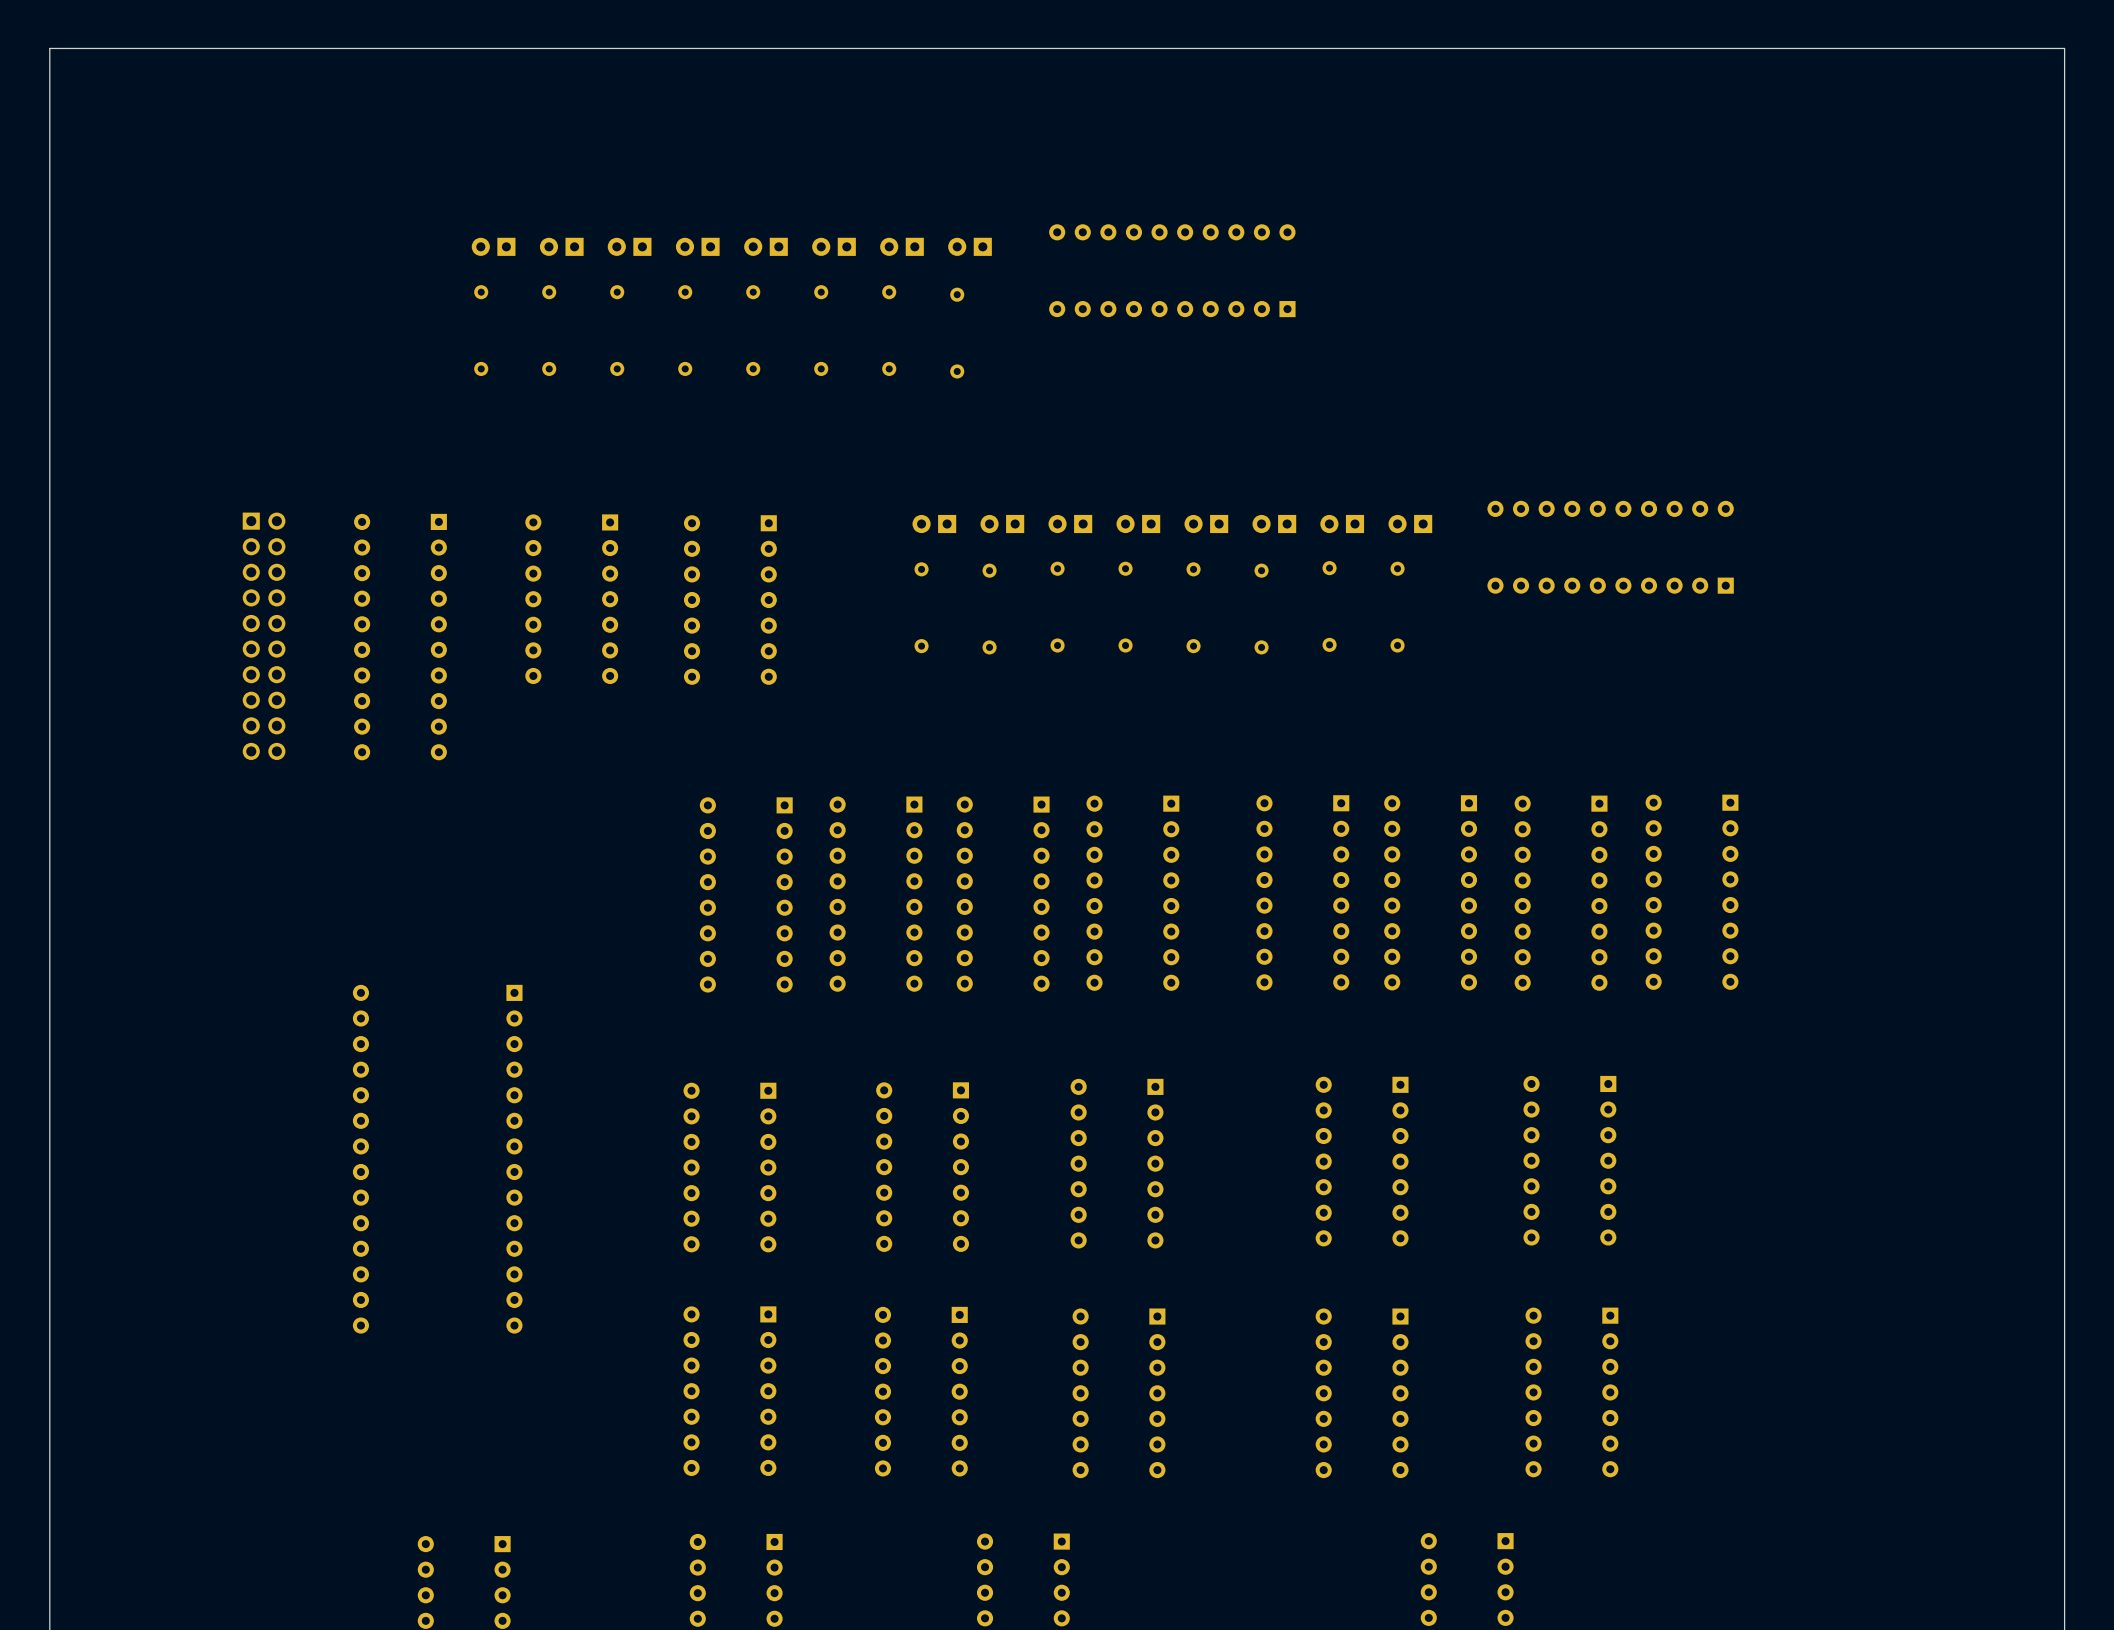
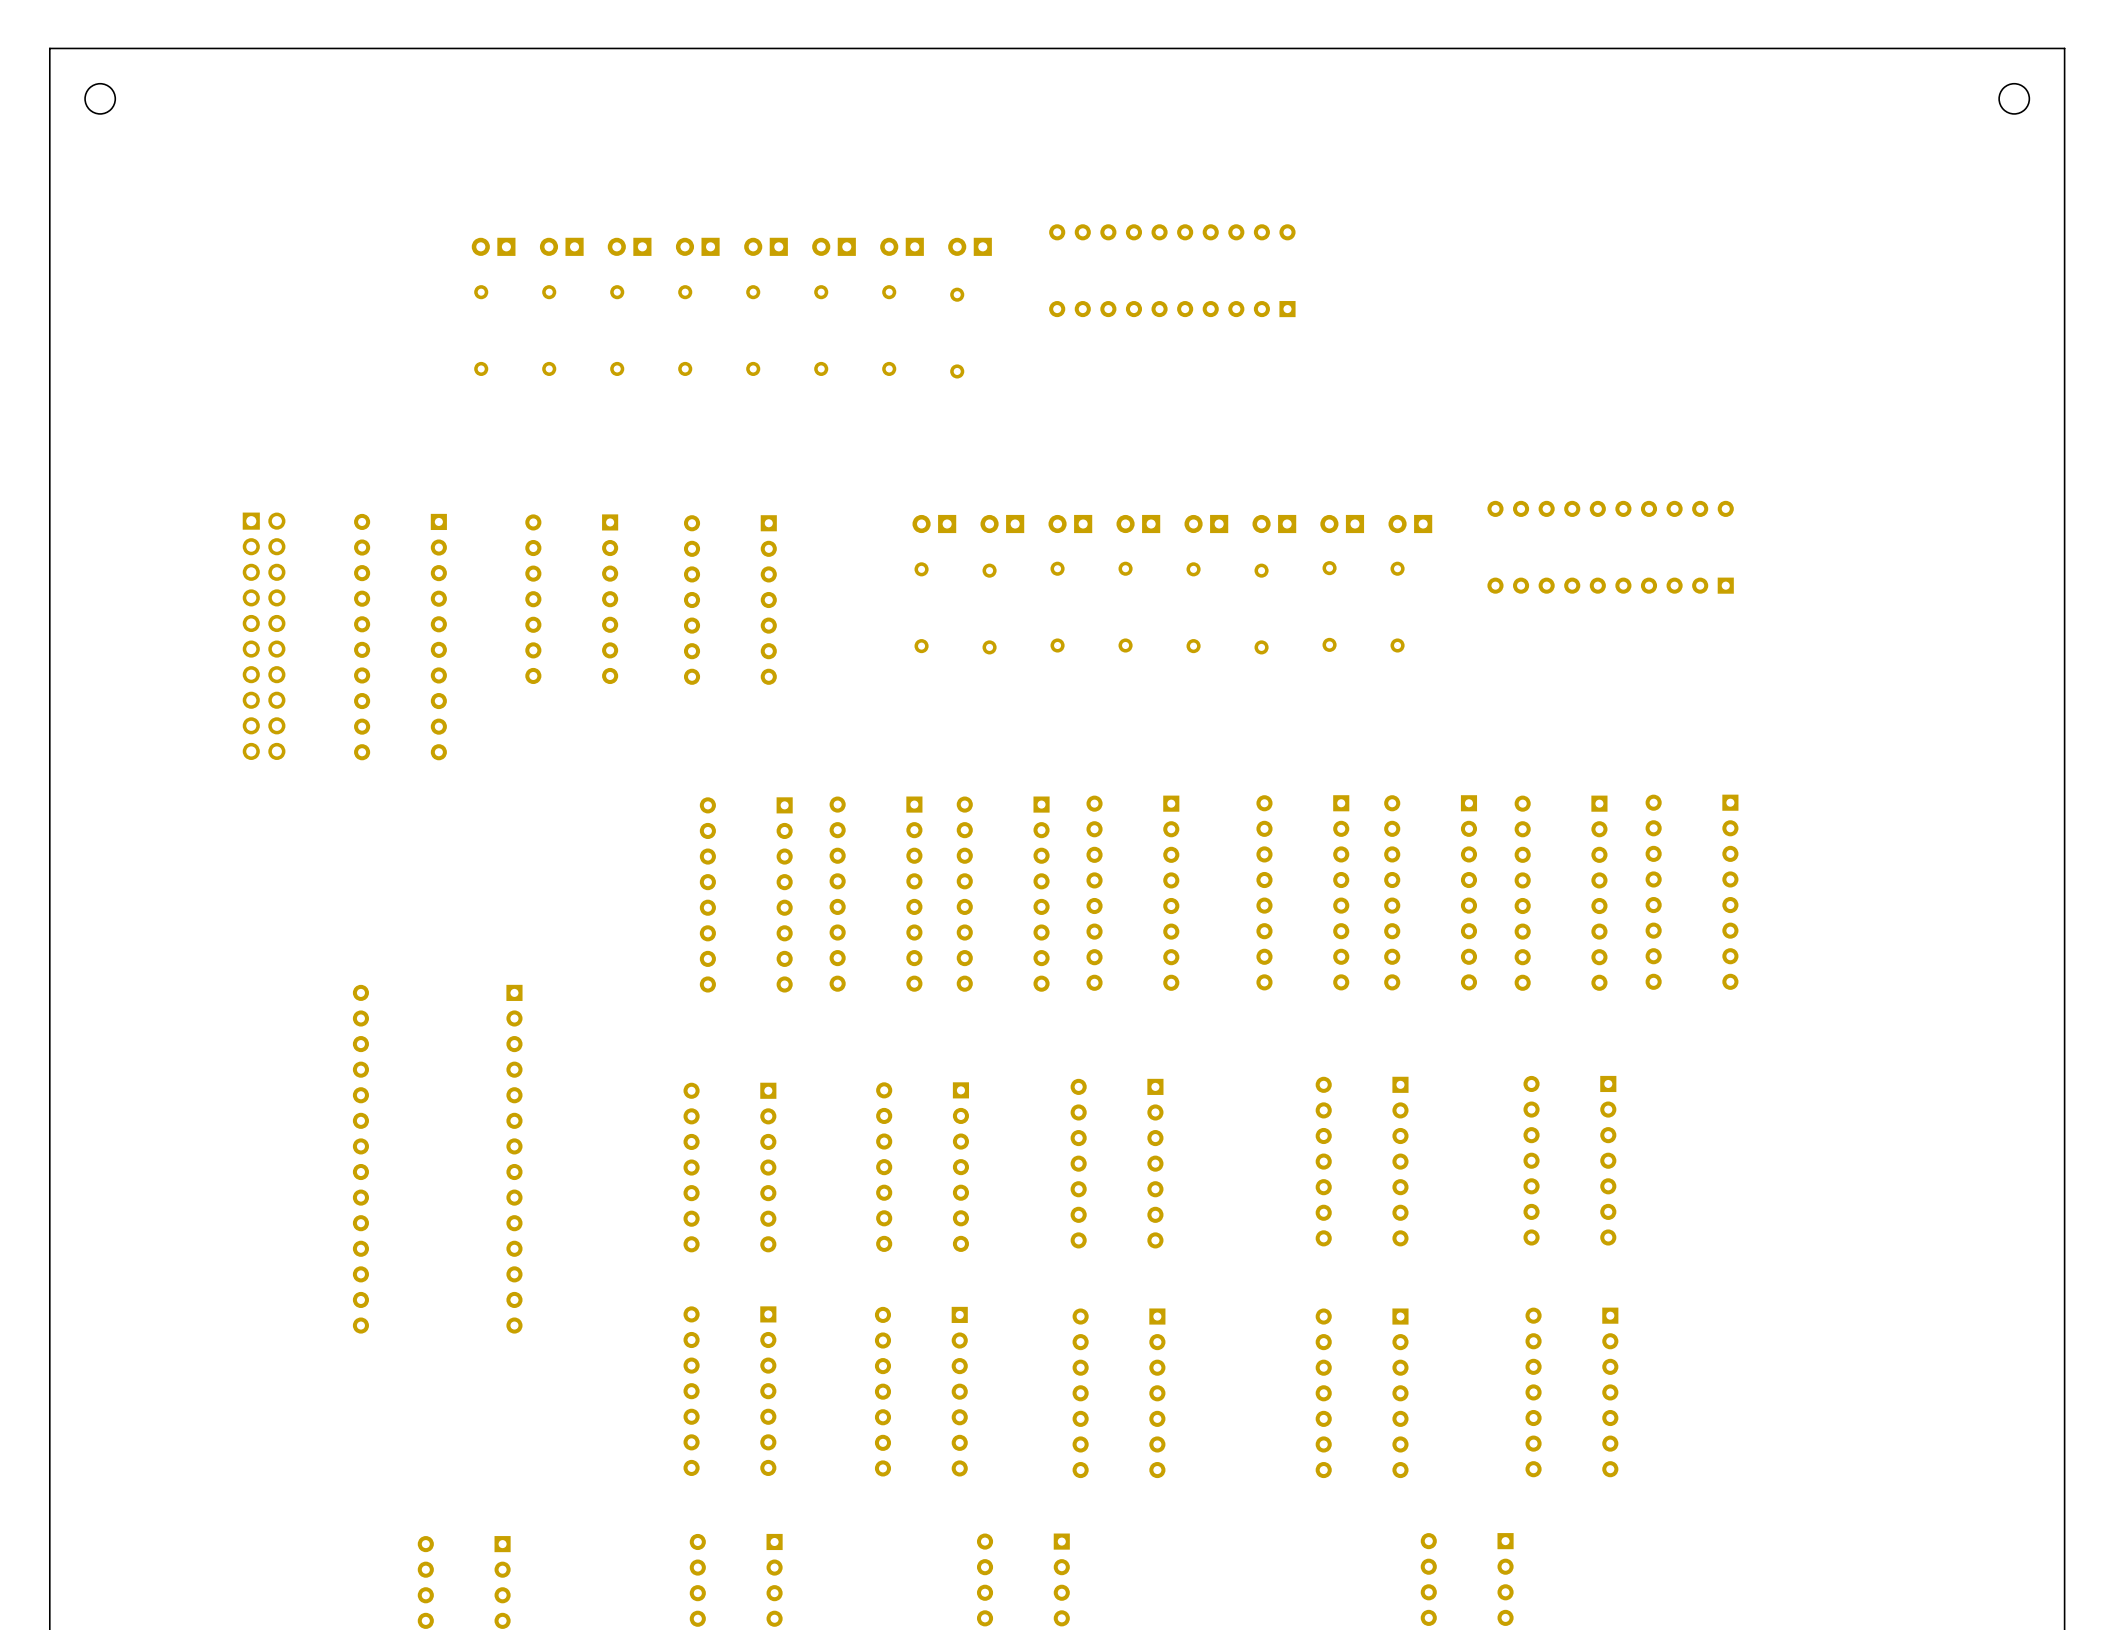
round board edge: none -> [84, 83, 116, 115]
round board edge: none -> [1998, 83, 2030, 115]

